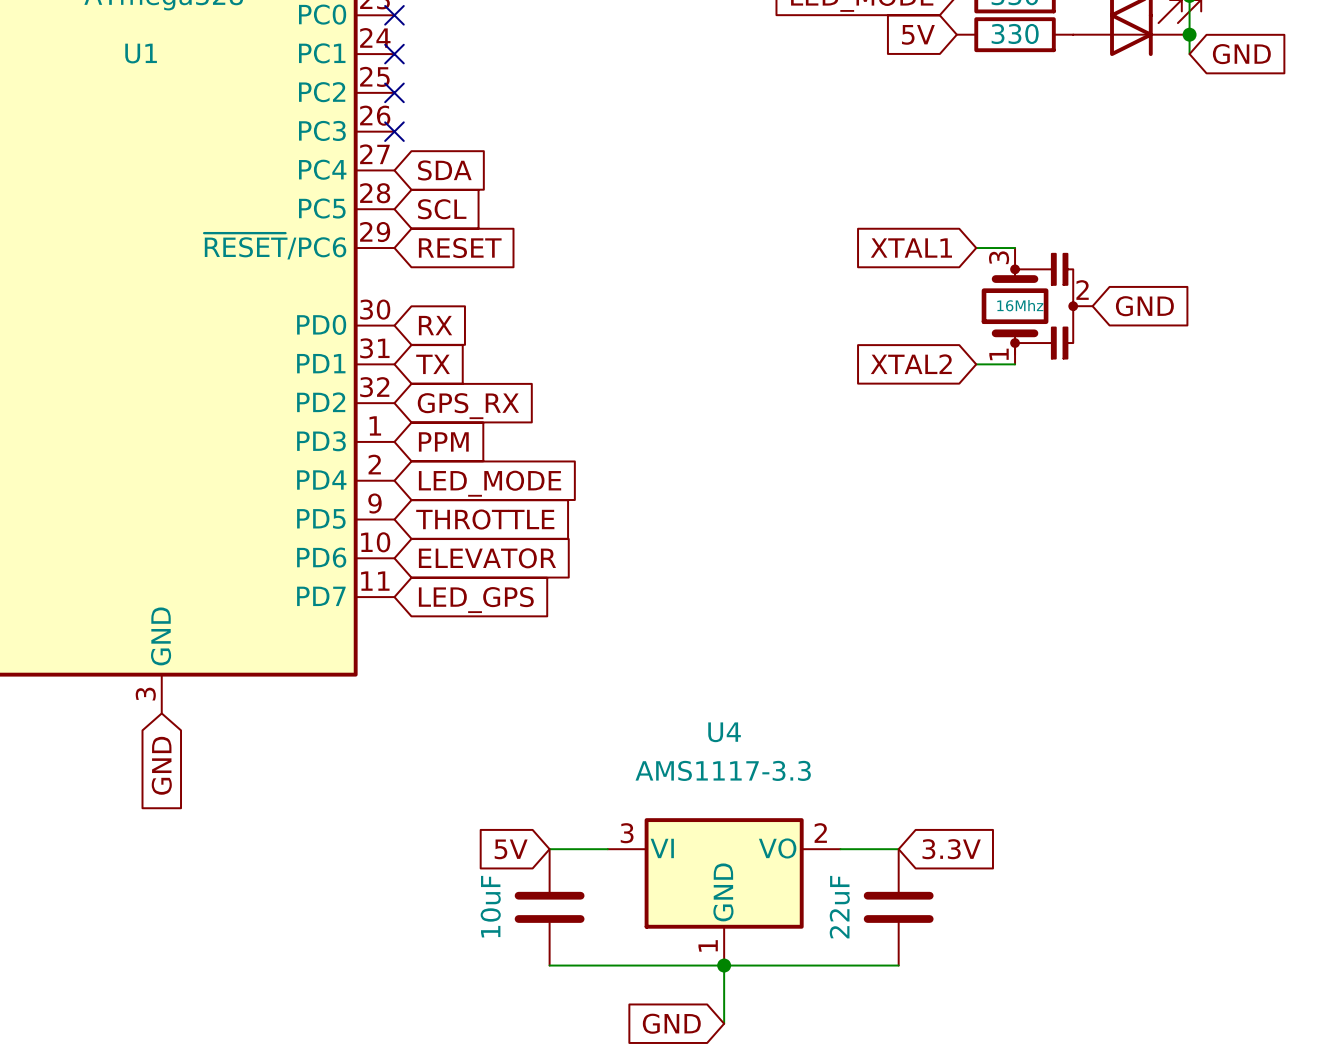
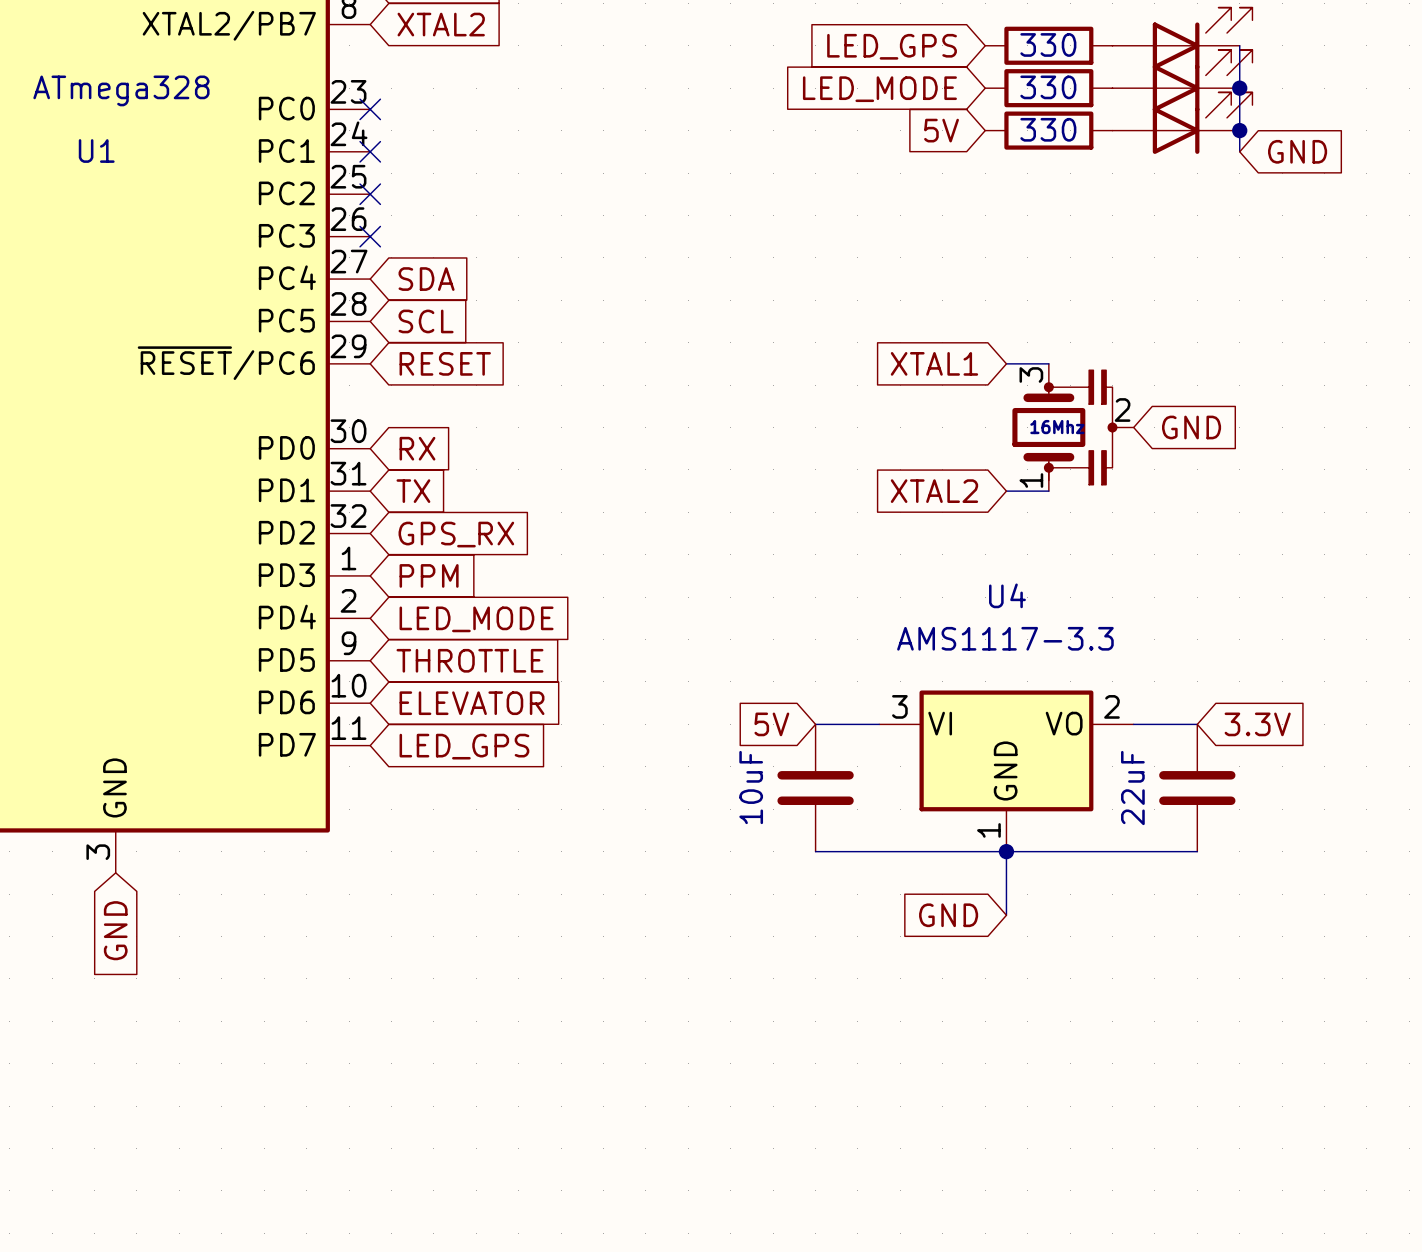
junction: none -> (1006, 851)
global label position: 5V (511, 849) -> 5V (771, 724)
wire: (549, 849) (607, 849) -> (815, 724) (879, 724)
wire: (840, 849) (898, 849) -> (1133, 724) (1197, 724)
global label position: 3.3V (951, 849) -> 3.3V (1257, 724)
U4 position: (724, 891) -> (1006, 771)
part position: (549, 907) -> (815, 788)
part position: (898, 907) -> (1197, 788)
wire: (549, 965) (898, 965) -> (815, 851) (1197, 851)
wire: (724, 965) (724, 1023) -> (1006, 851) (1006, 915)
junction: (724, 965) -> none
global label position: GND (671, 1023) -> GND (948, 915)

